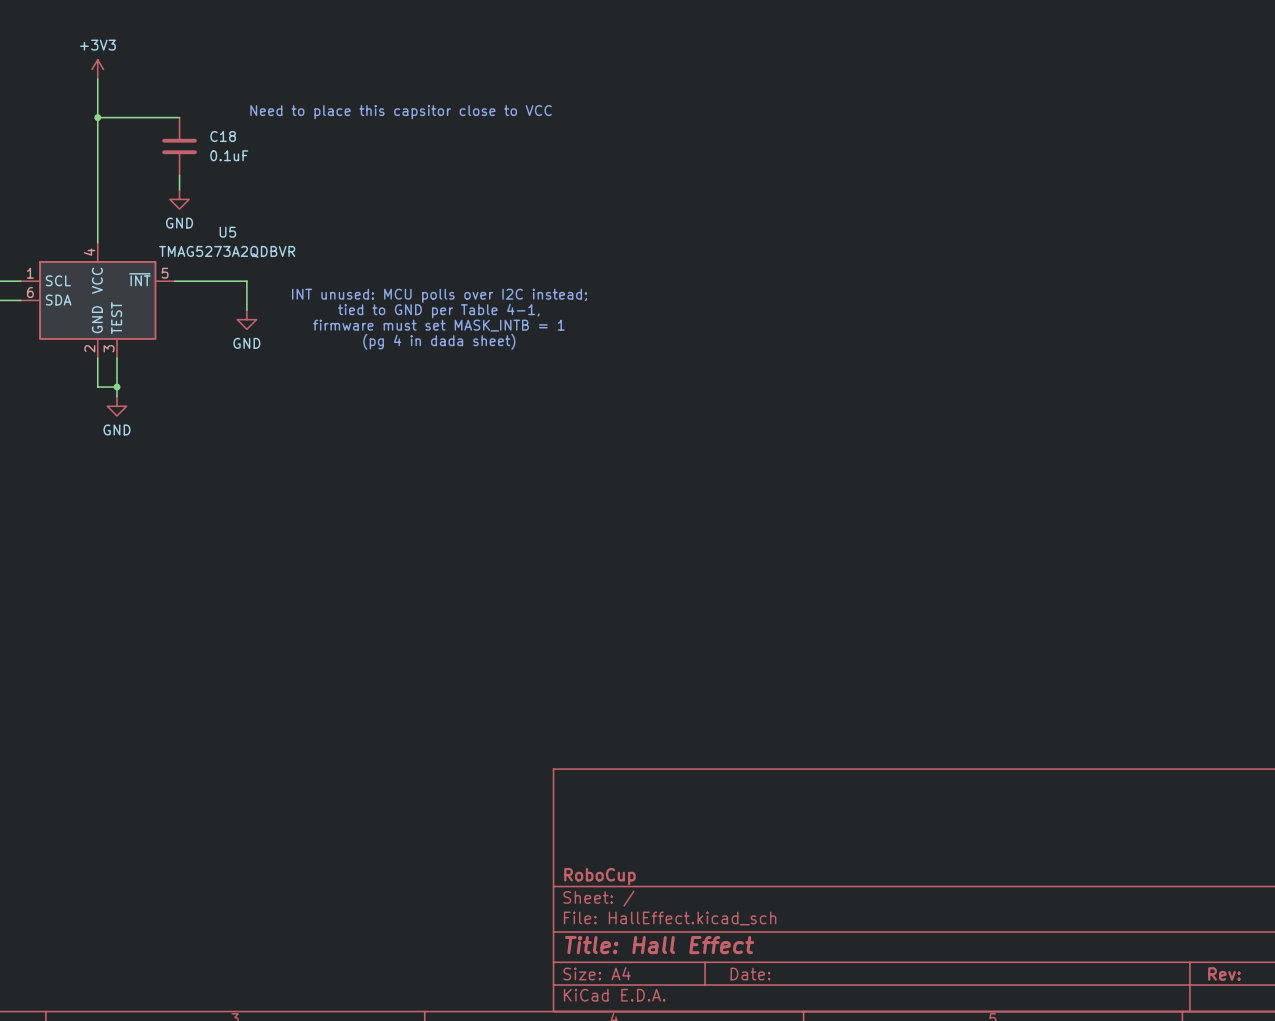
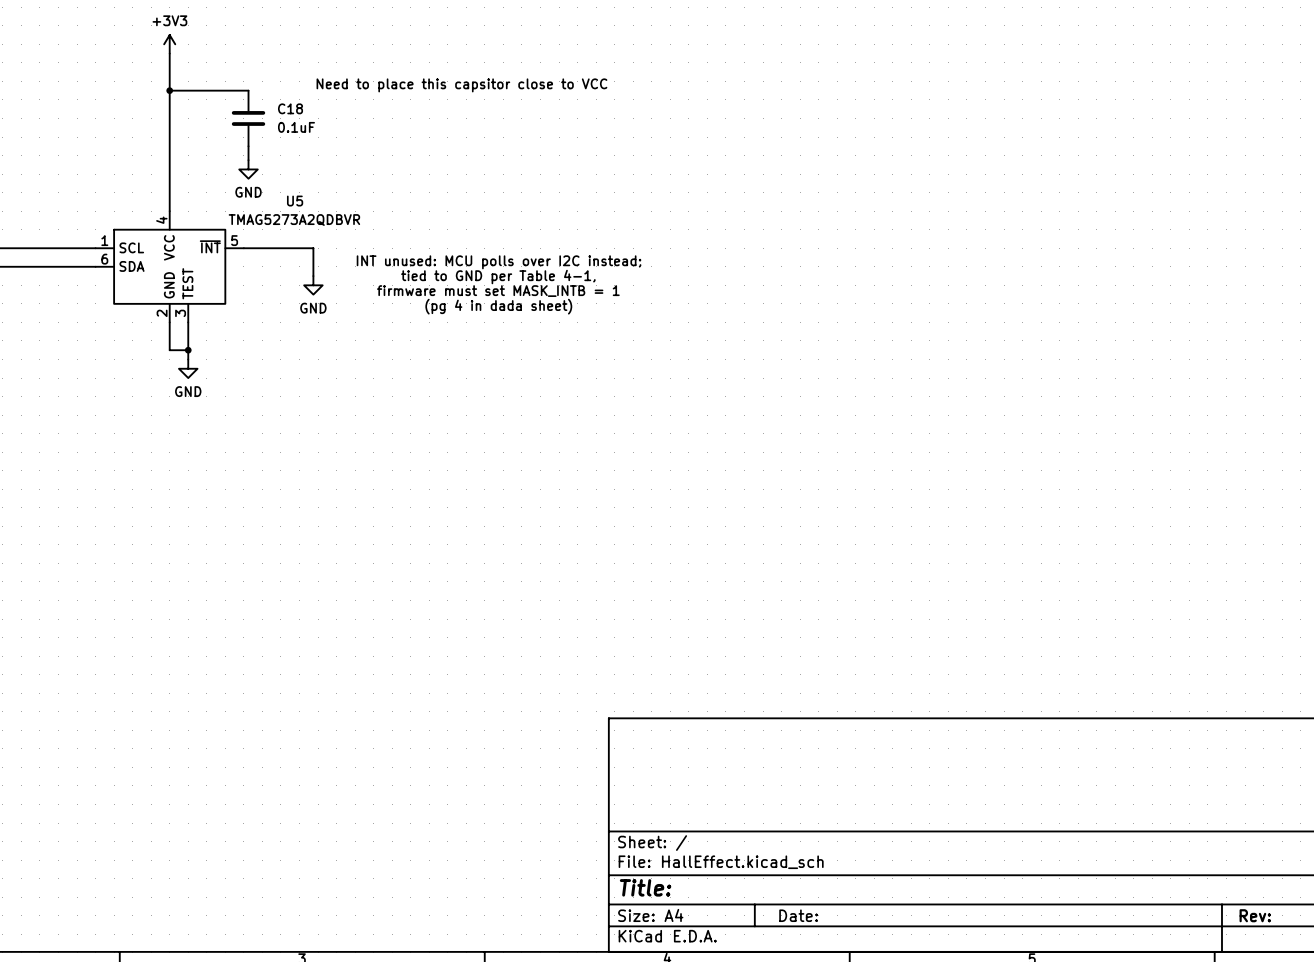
title block: RoboCup (599, 876) -> none
title block: Title: Hall Effect (659, 945) -> Title: (645, 887)

